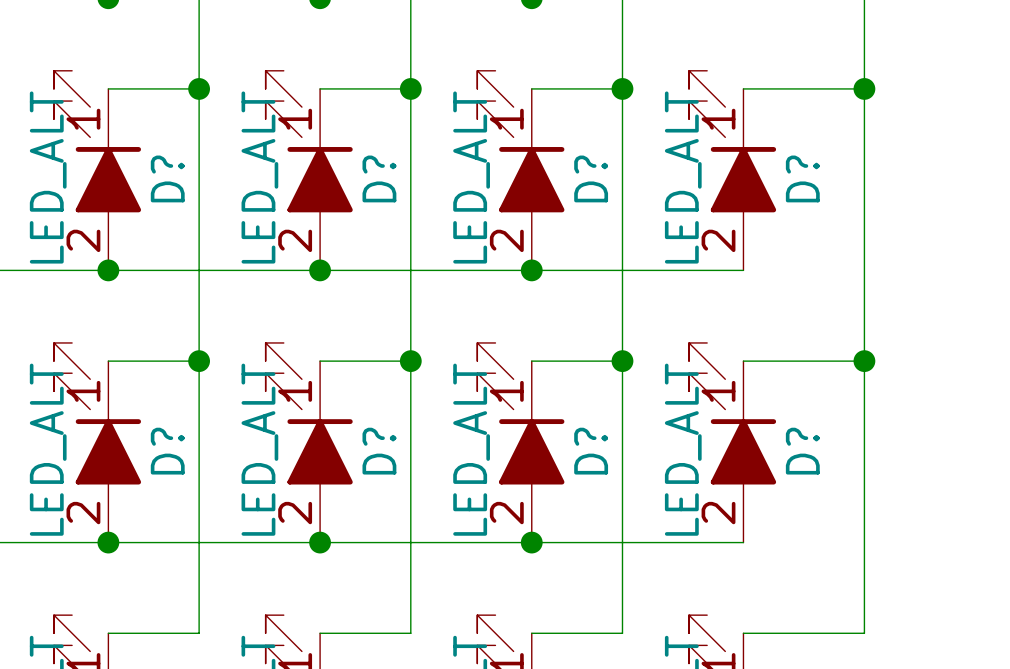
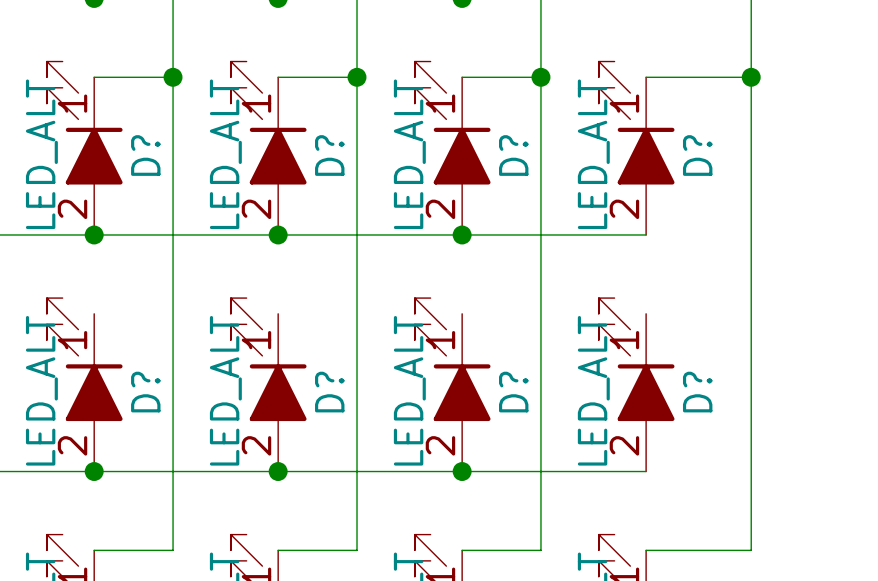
wire: (108, 361) (199, 361) -> none
junction: (199, 361) -> none
wire: (320, 361) (410, 361) -> none
junction: (410, 361) -> none
wire: (531, 361) (622, 361) -> none
junction: (622, 361) -> none
wire: (743, 361) (864, 361) -> none
junction: (864, 361) -> none

